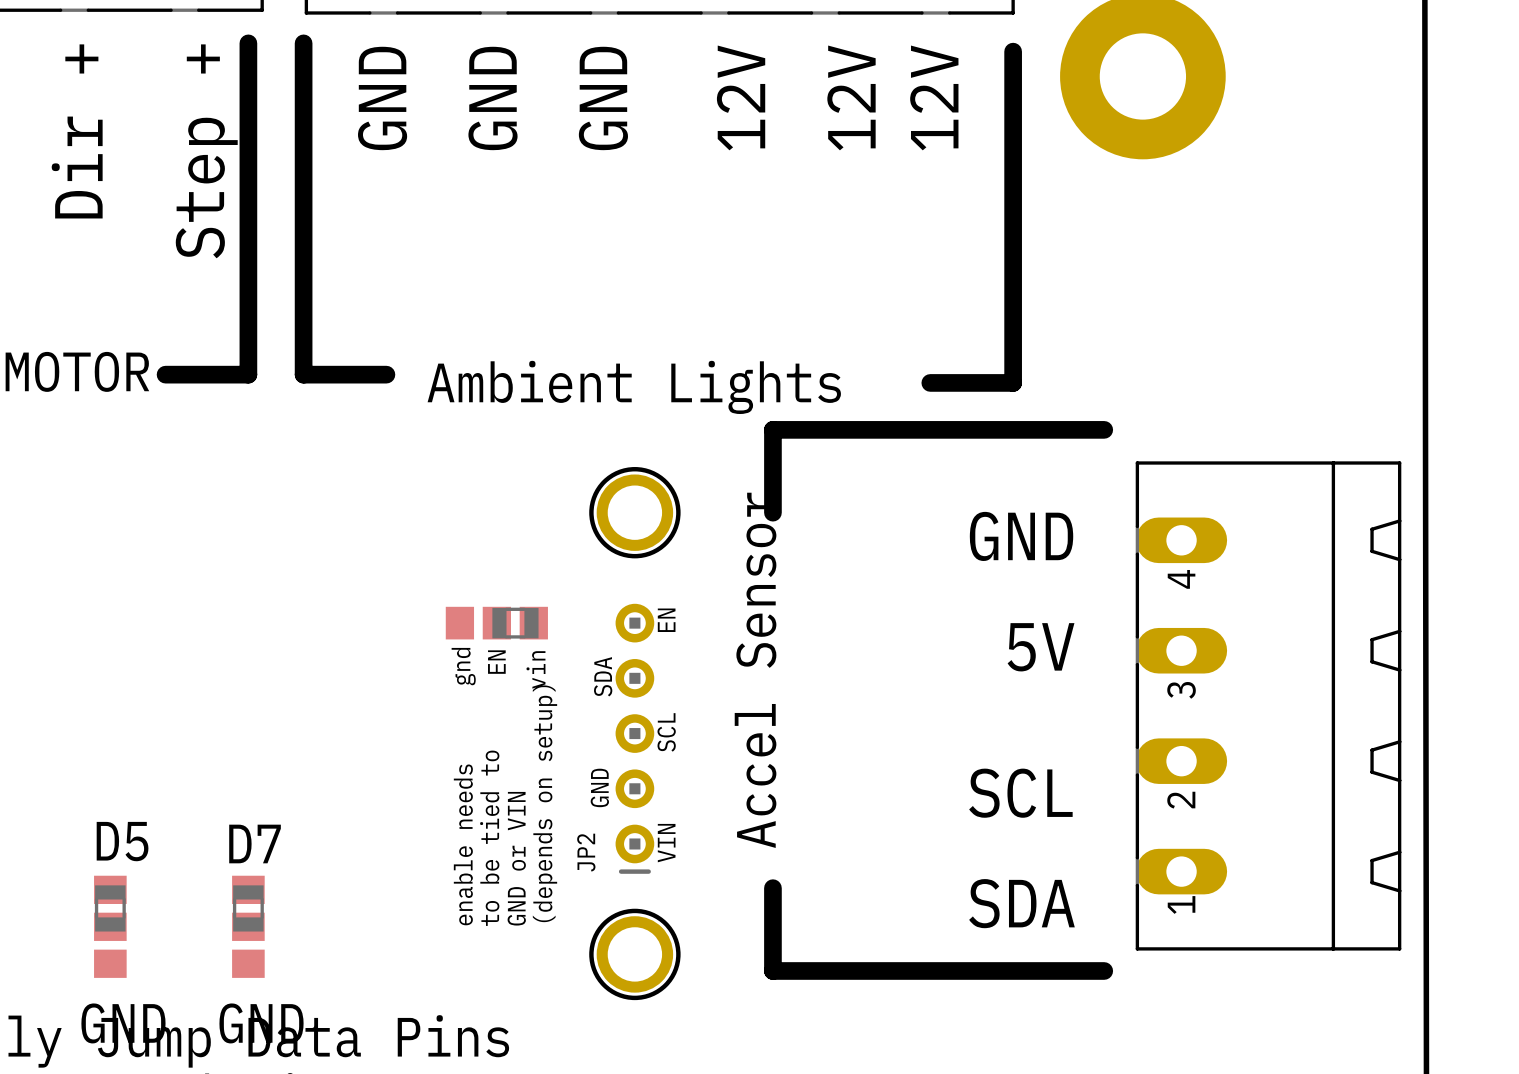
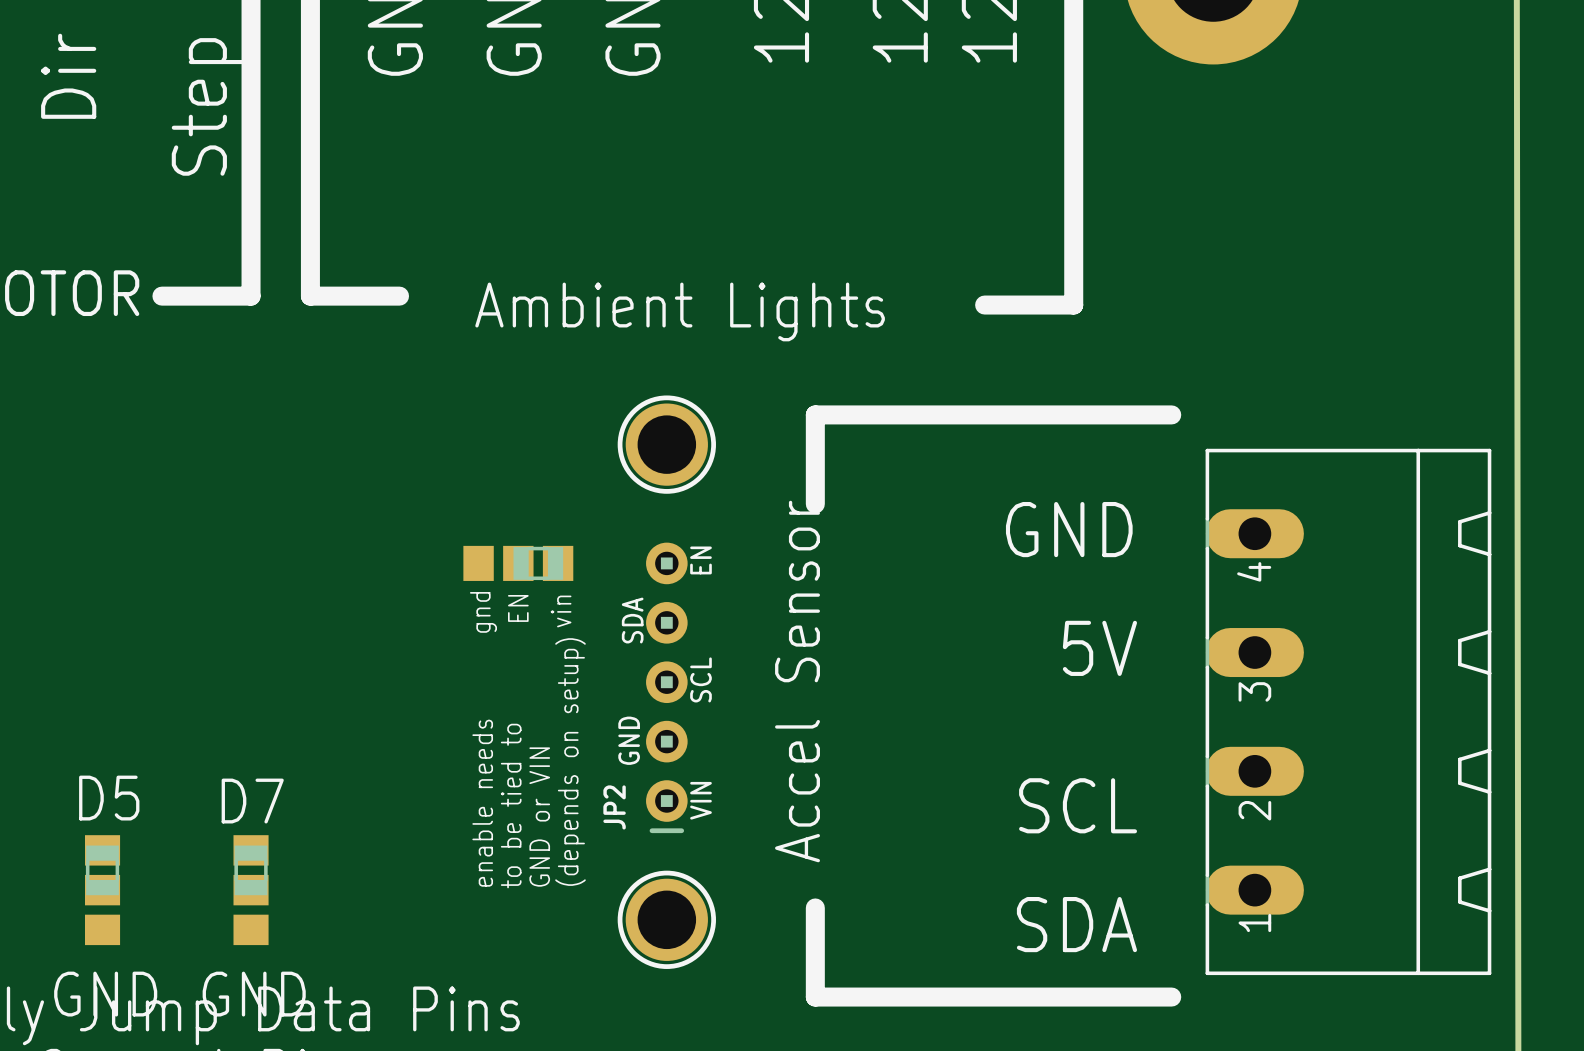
line: (1104, 429) (772, 429) (772, 485) -> (1171, 414) (815, 414)
text position: GND (1021, 536) -> GND (1069, 529)
text position: 5V (1041, 647) -> 5V (1099, 648)
text position: Accel Sensor (755, 670) -> Accel Sensor (797, 681)
part position: (1268, 705) -> (1348, 711)
text position: SCL (1020, 793) -> SCL (1078, 805)
line: (772, 888) (772, 943) -> (815, 444) (815, 504)
text position: SDA (1021, 903) -> SDA (1076, 924)
line: (772, 970) (1104, 970) -> (815, 937) (815, 997) (1171, 997)

